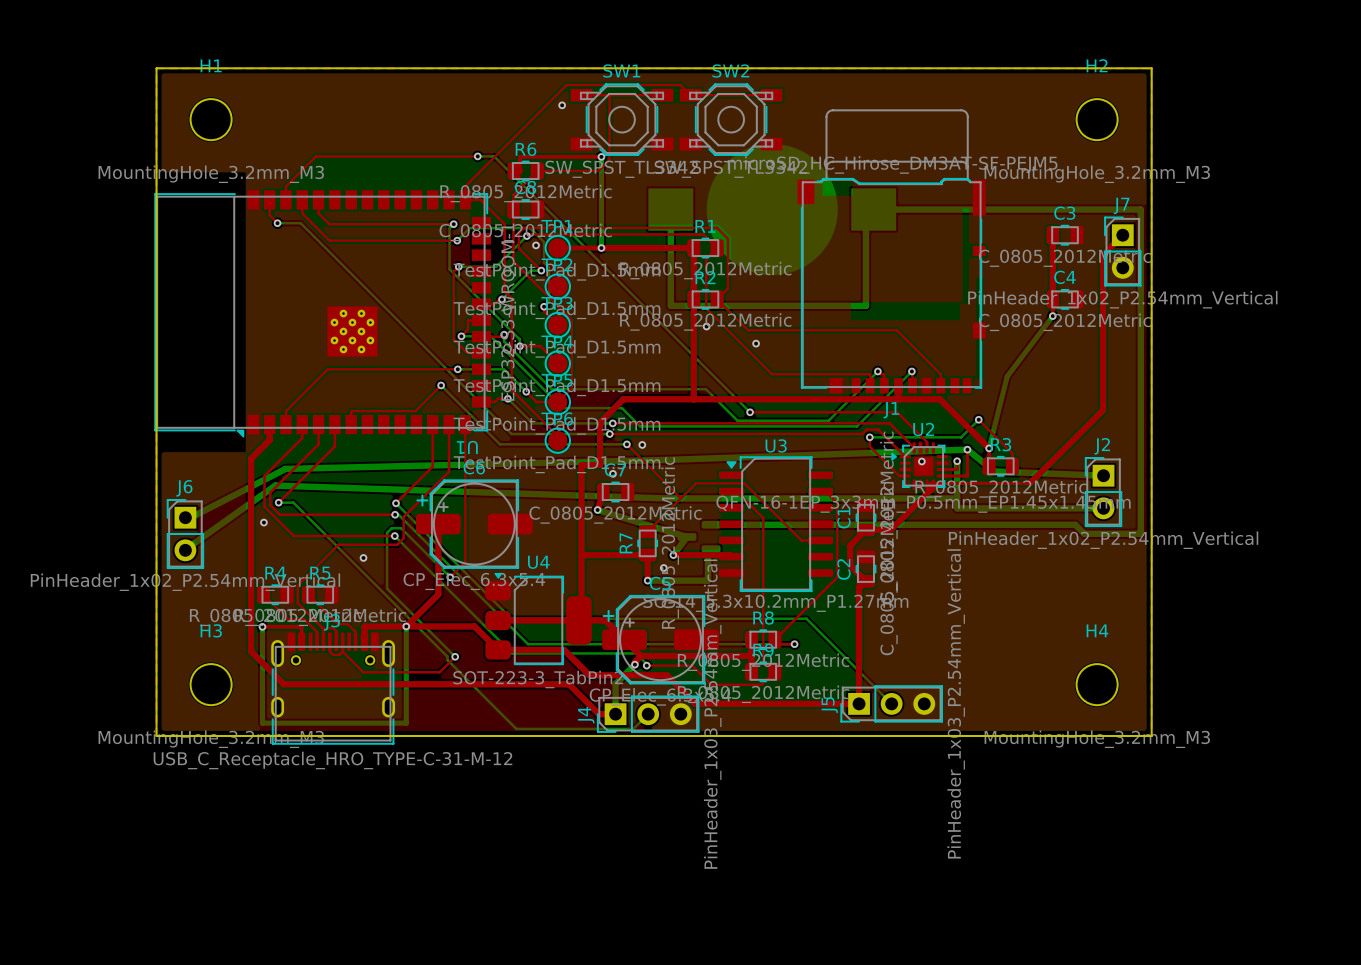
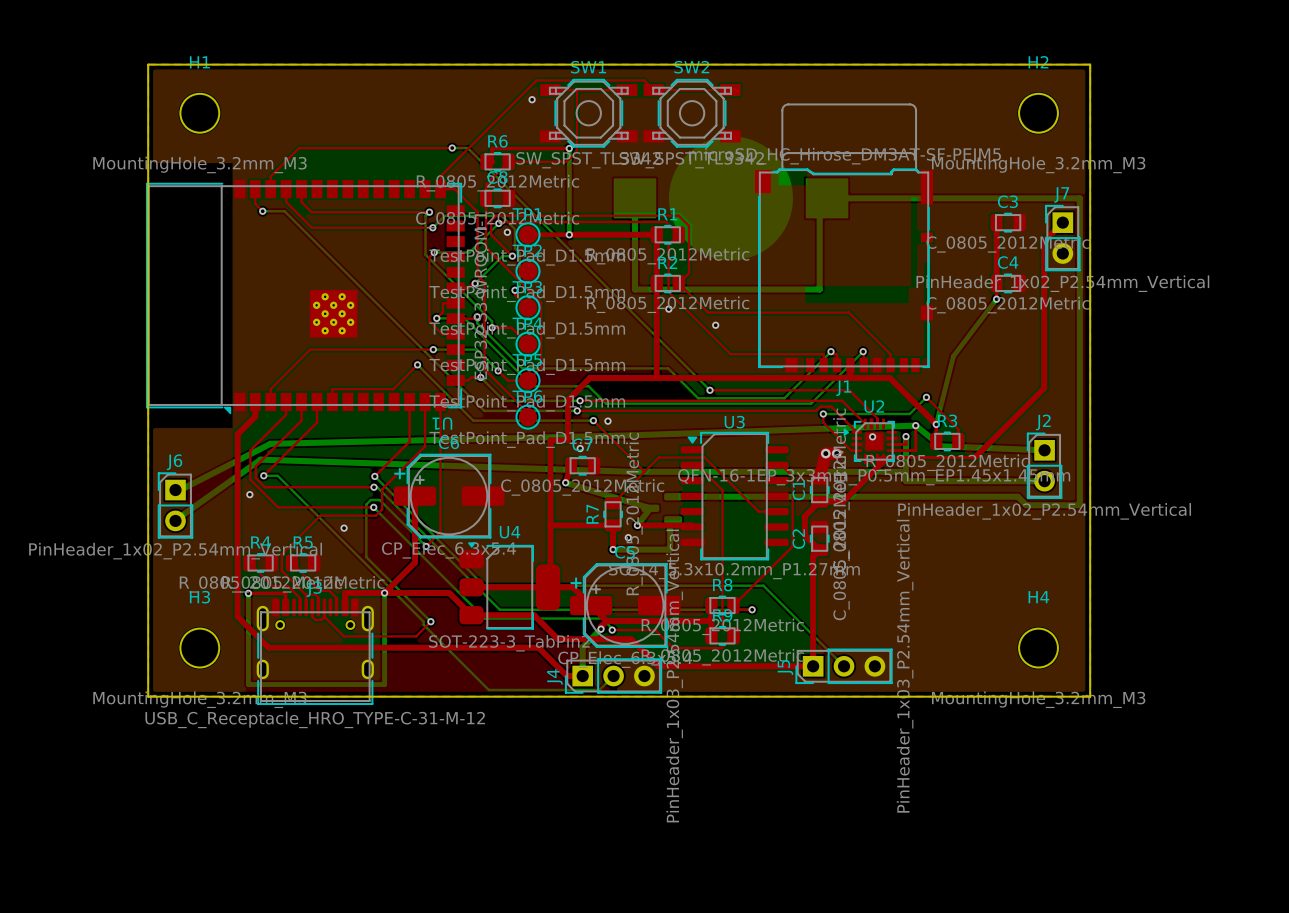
via: none -> (825, 453)
top track: none -> (836, 453) (825, 453) (819, 478)
via: none -> (836, 453)

